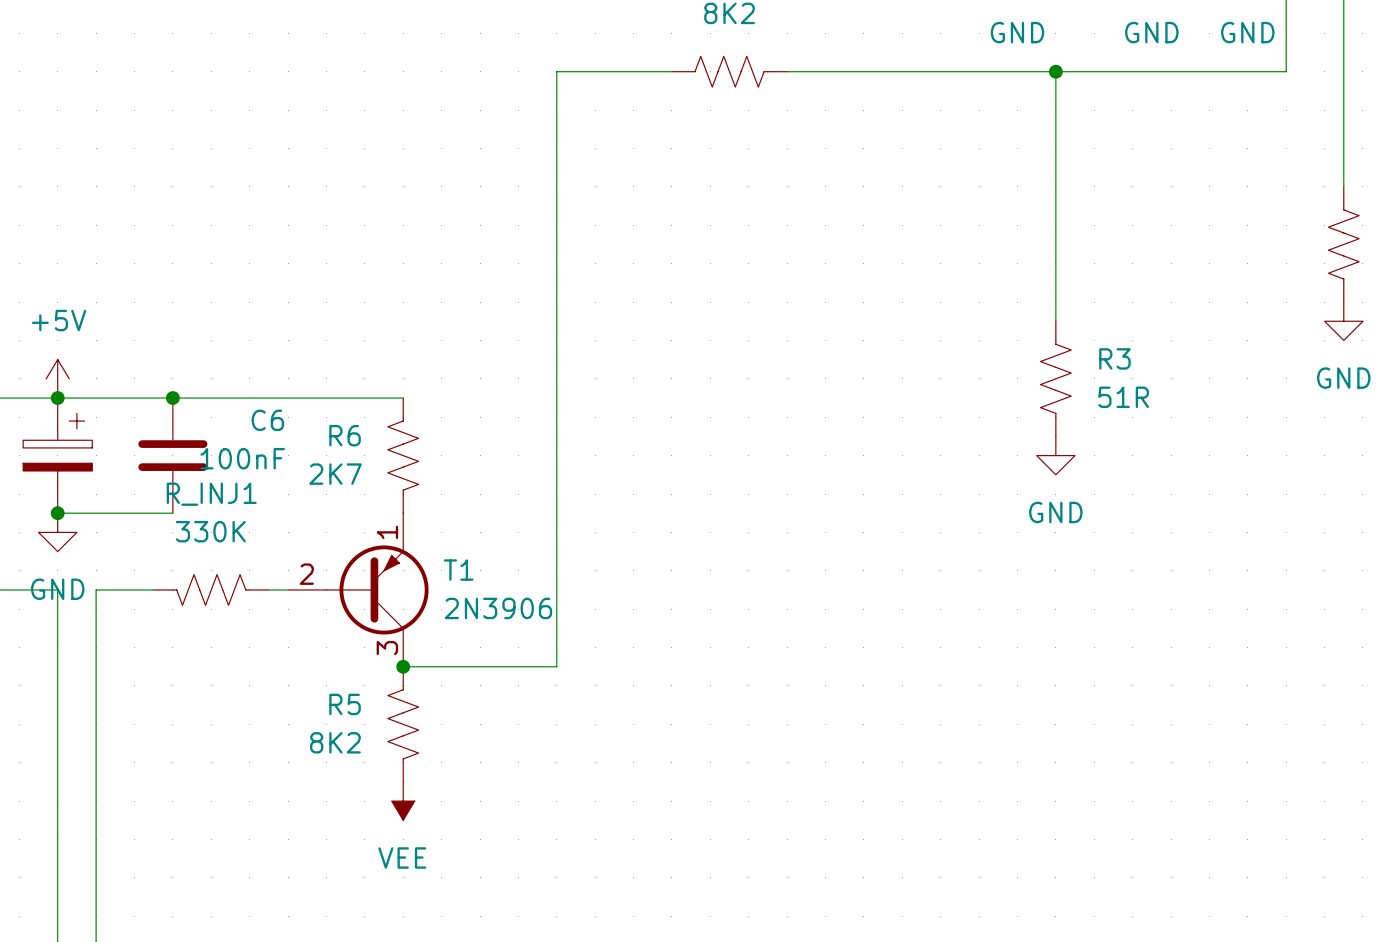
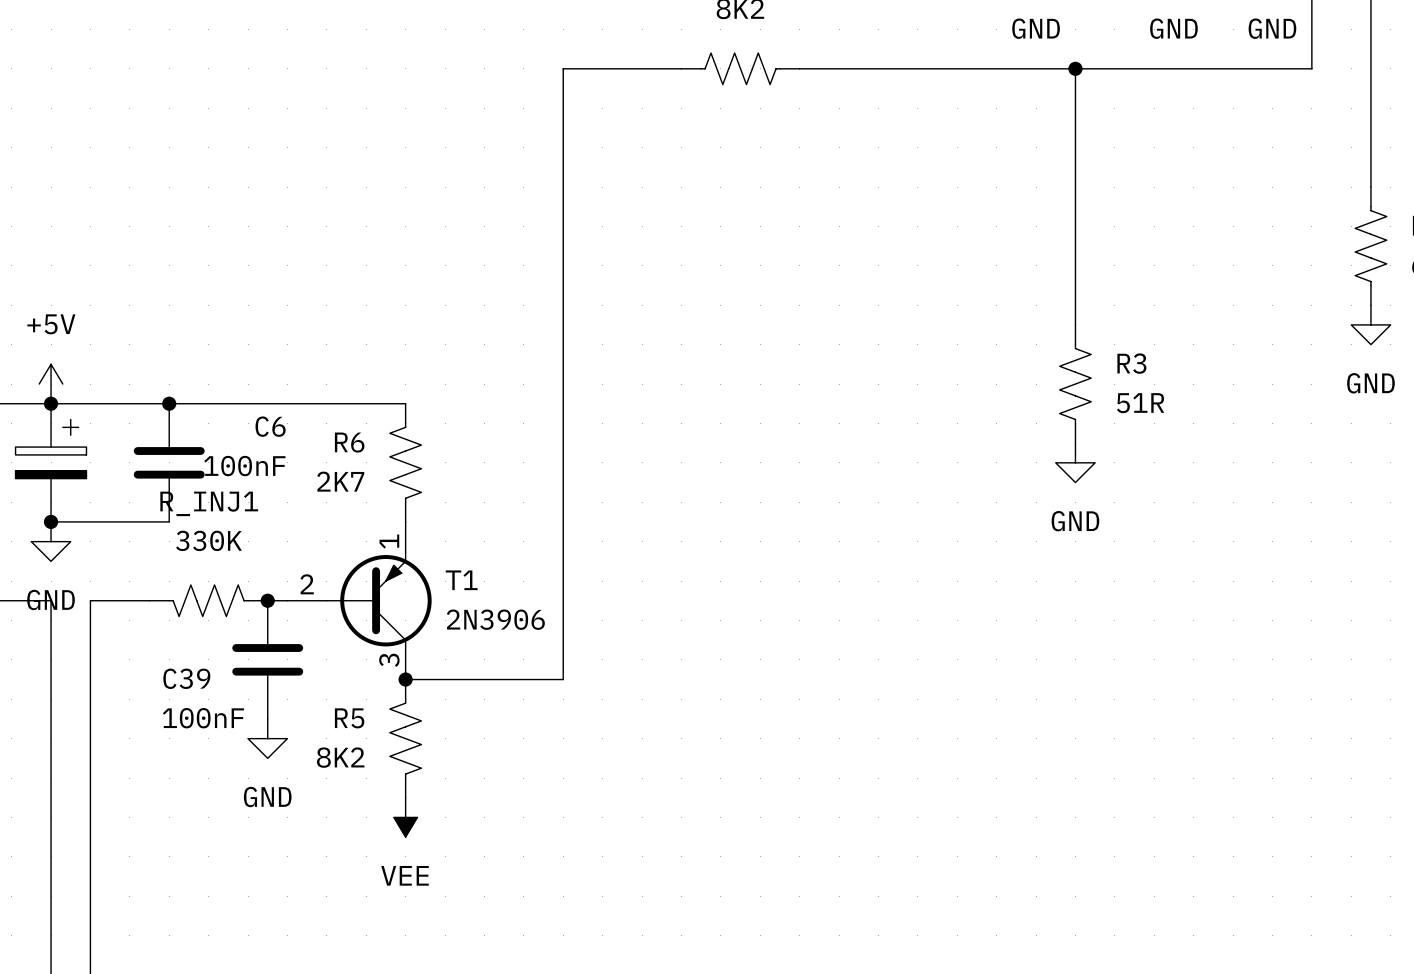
junction: none -> (267, 600)
C39: none -> 100nF (267, 659)
power symbol: none -> GND (267, 738)

